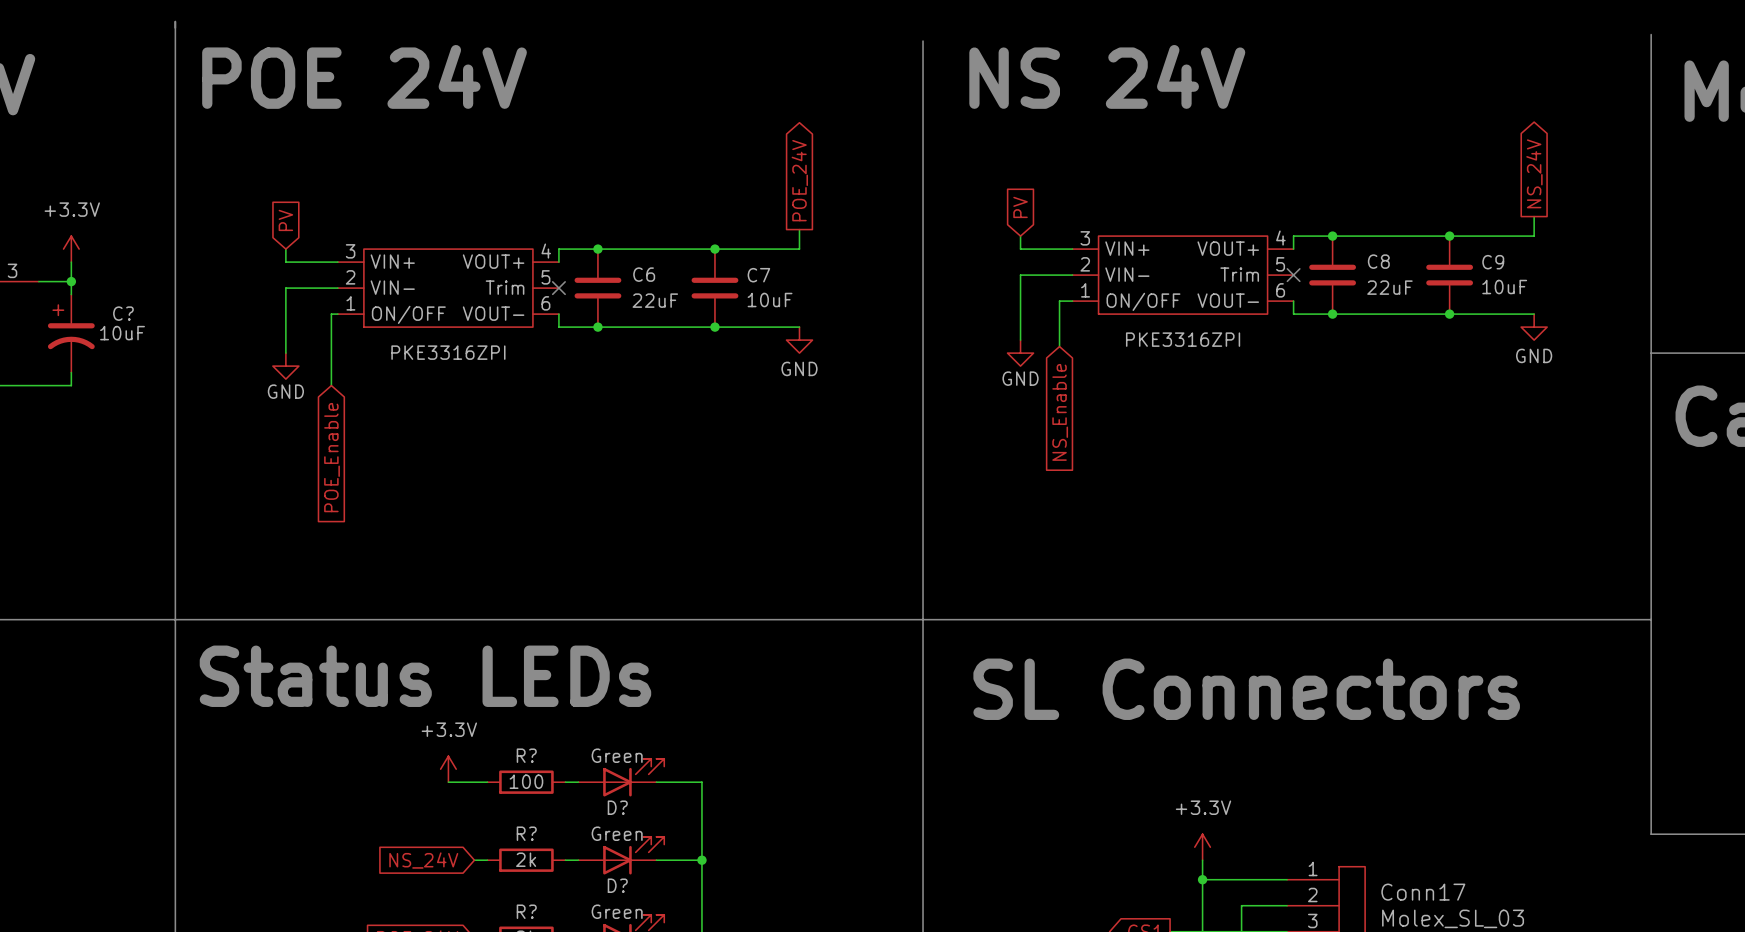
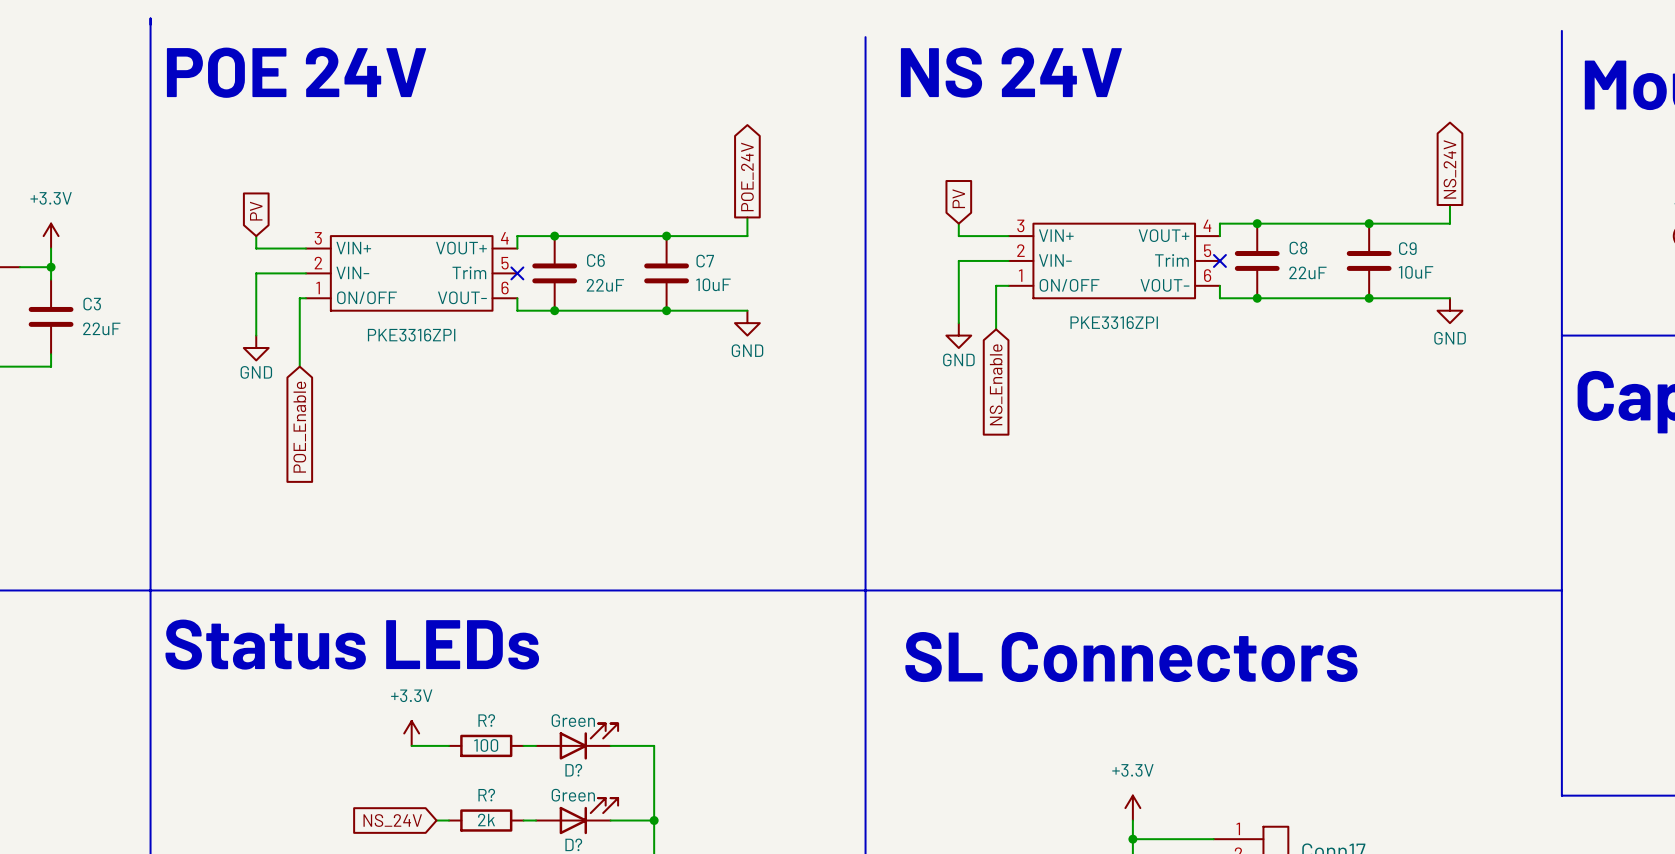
C?: 10uF (71, 333) -> none
C3: none -> 22uF (51, 316)

